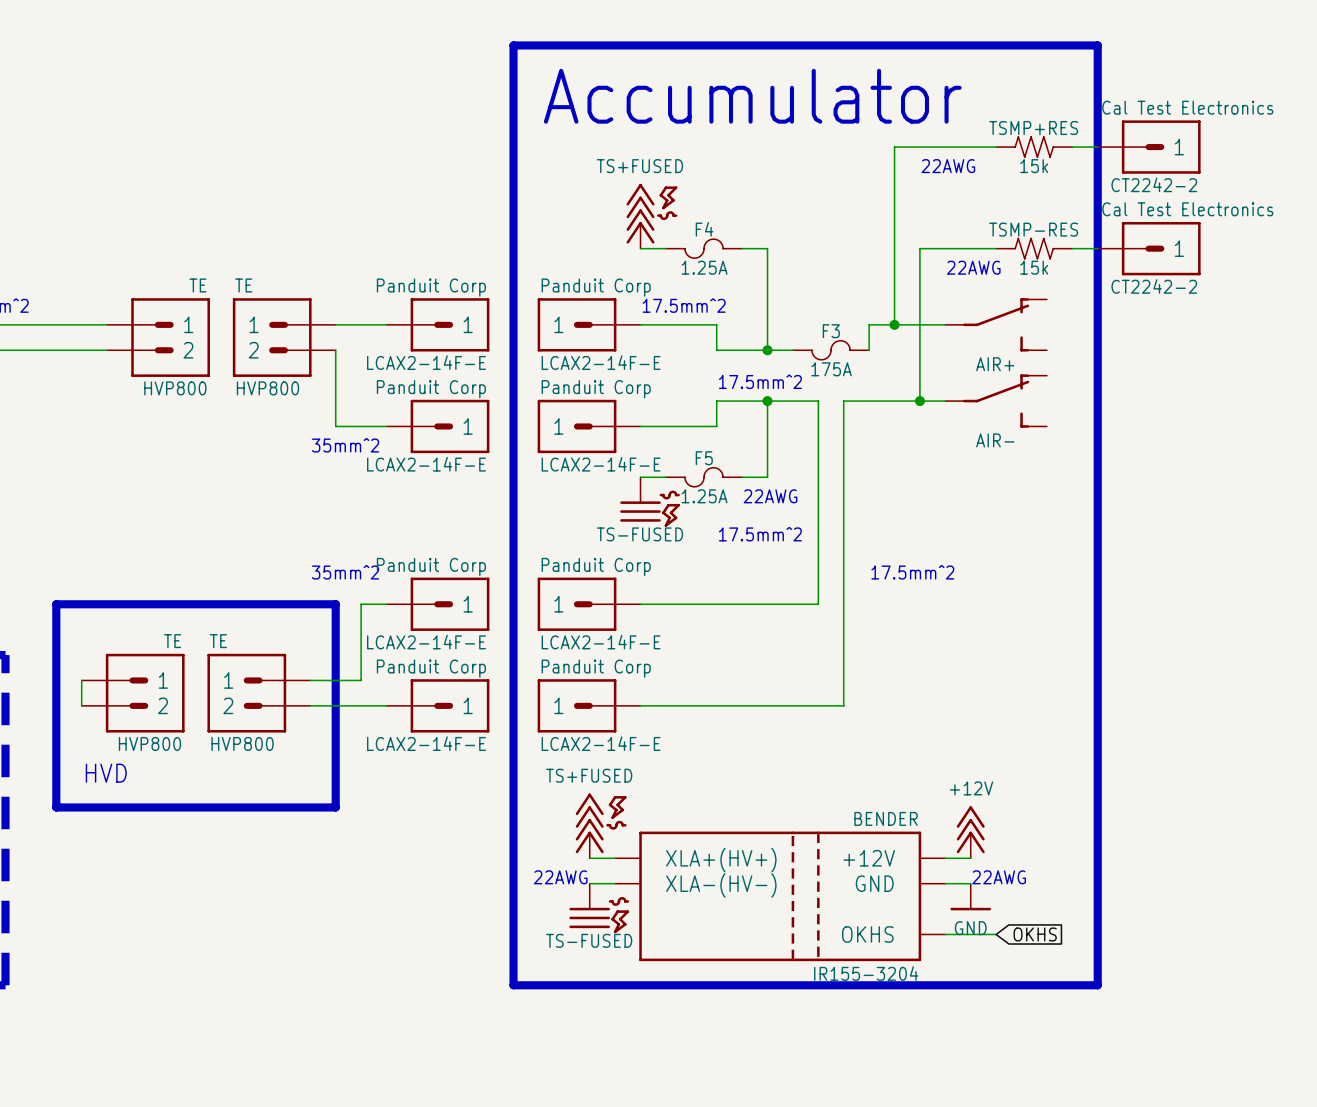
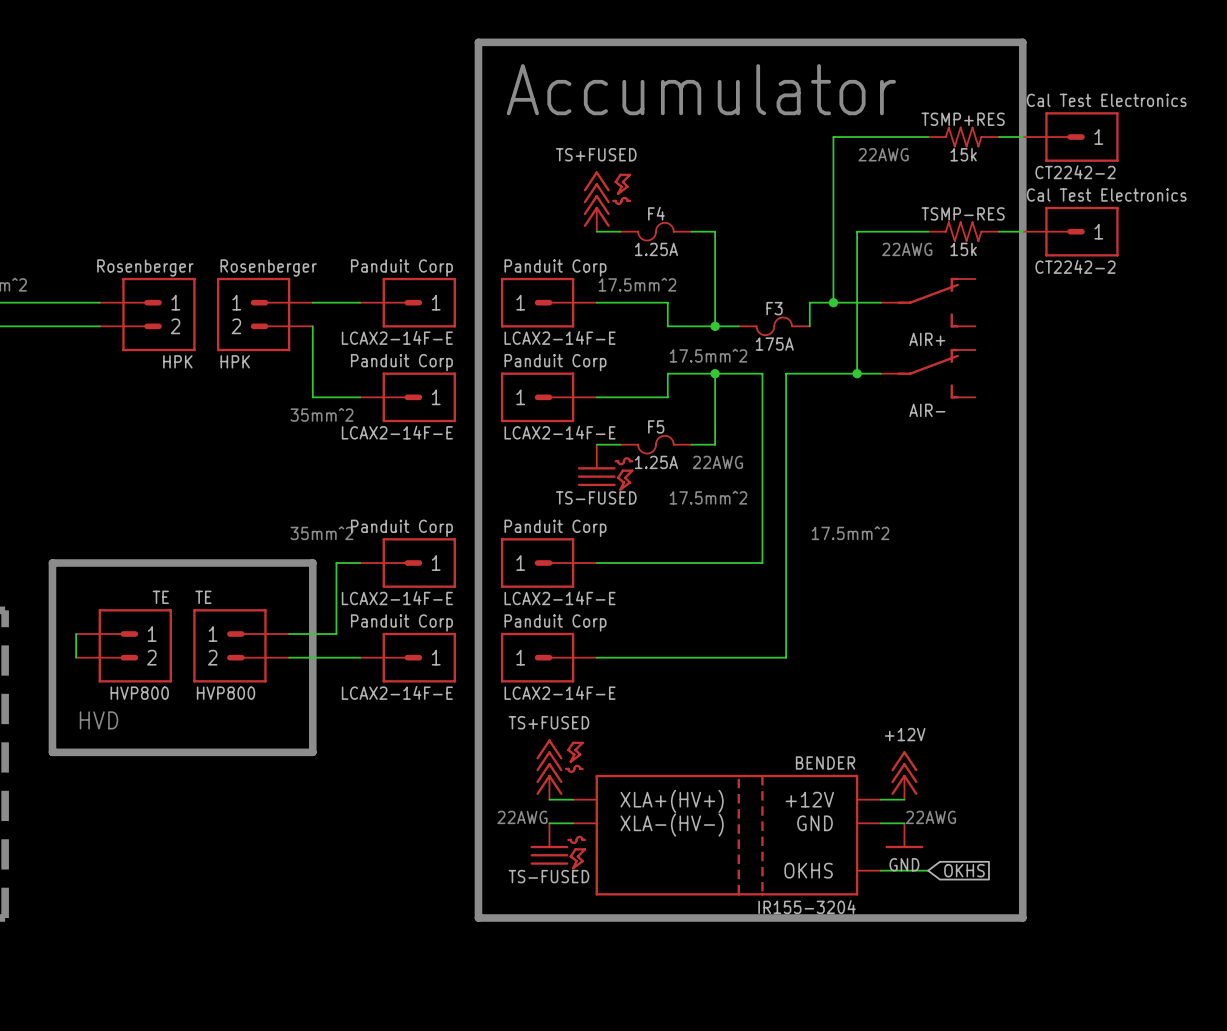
part text: TE (197, 285) -> Rosenberger (145, 267)
part text: TE (243, 285) -> Rosenberger (268, 267)
part text: HVP800 (175, 388) -> HPK (177, 361)
part text: HVP800 (267, 388) -> HPK (235, 361)

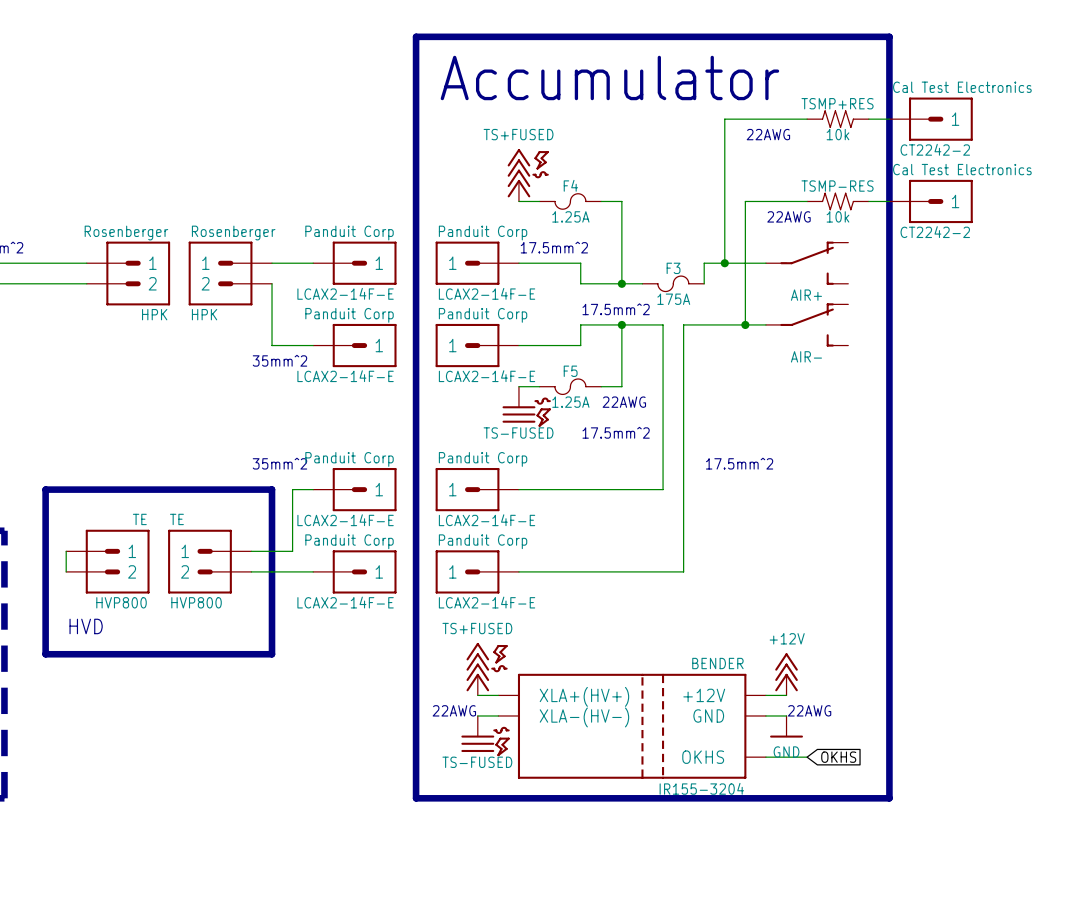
TSMP+RES value: 15k (963, 154) -> 10k (837, 134)
TSMP-RES value: 15k (963, 249) -> 10k (837, 216)

